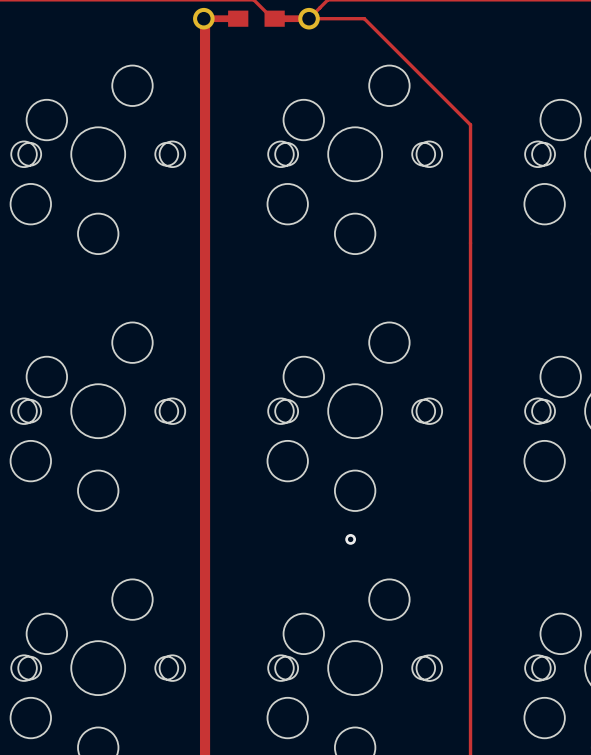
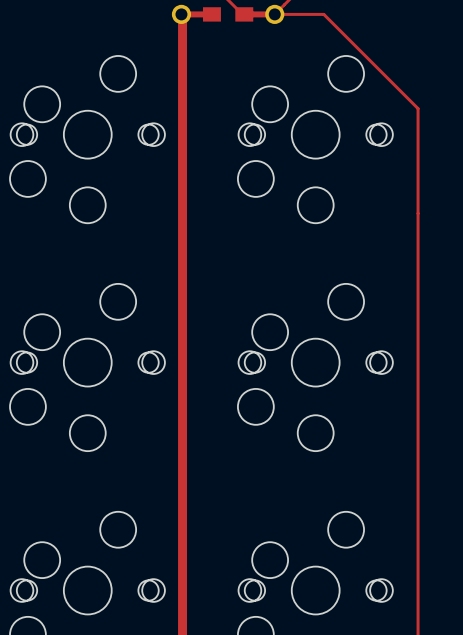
via: (350, 539) -> none

